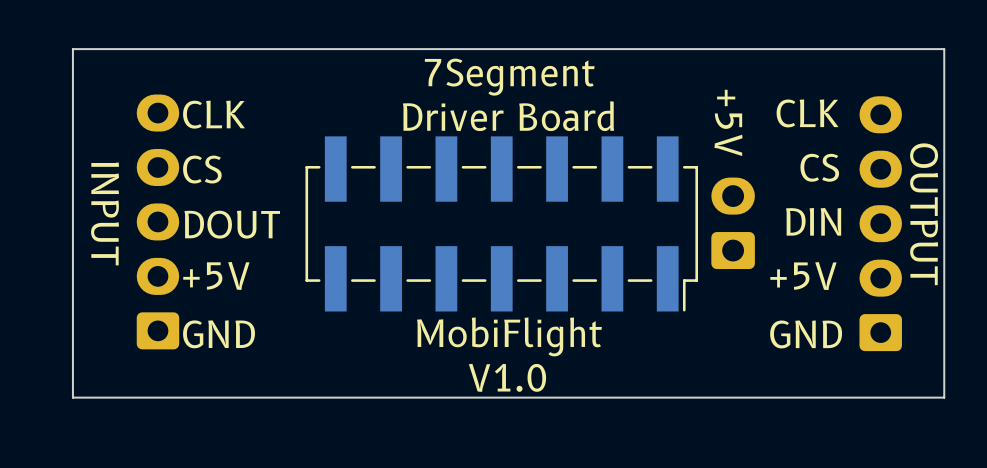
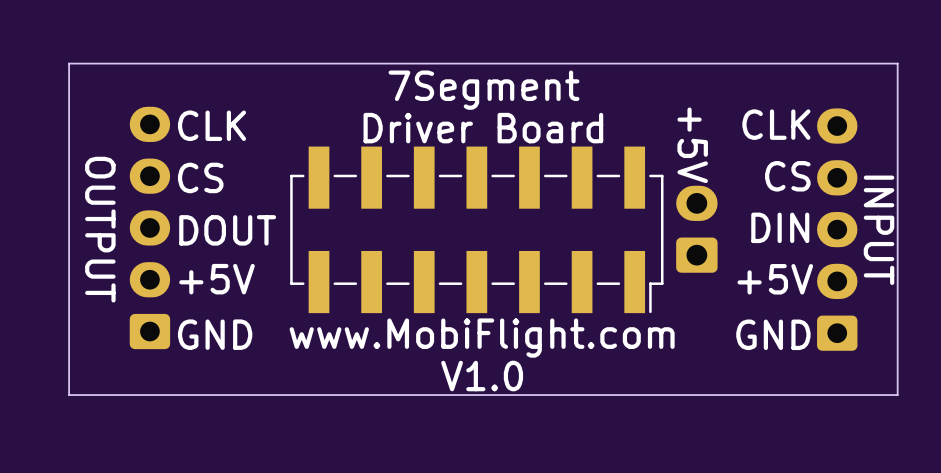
text: INPUT (105, 213) -> OUTPUT (100, 229)
text: OUTPUT (924, 214) -> INPUT (879, 230)
text: MobiFlight (509, 336) -> www.MobiFlight.com (482, 338)

